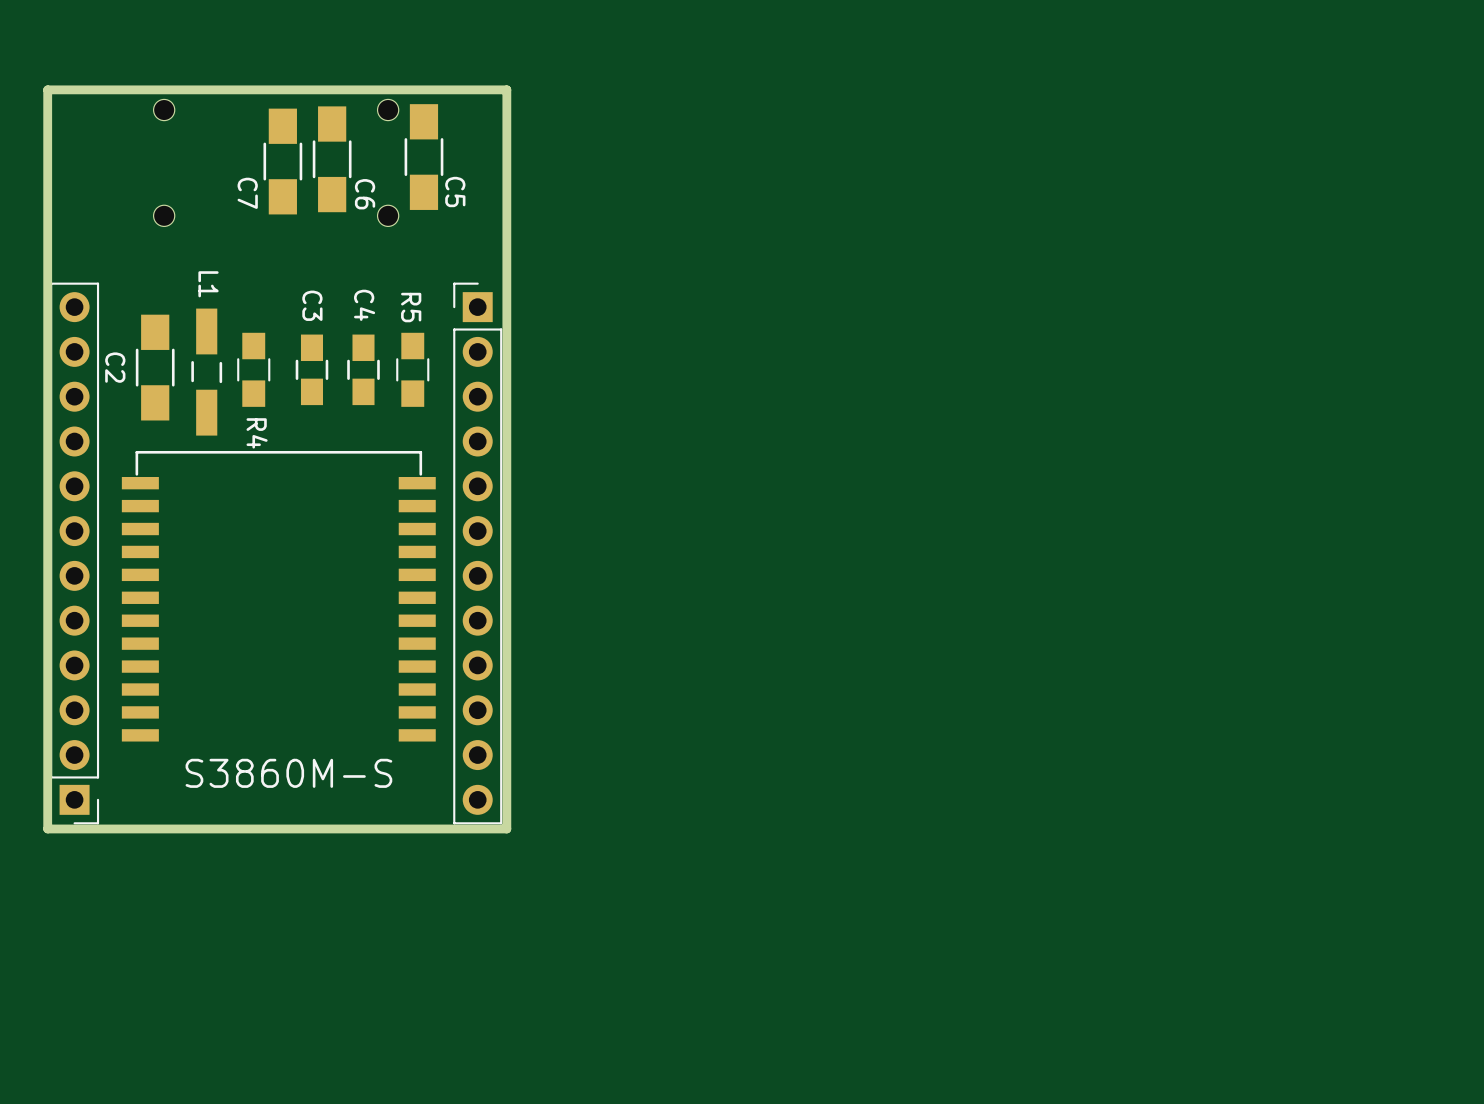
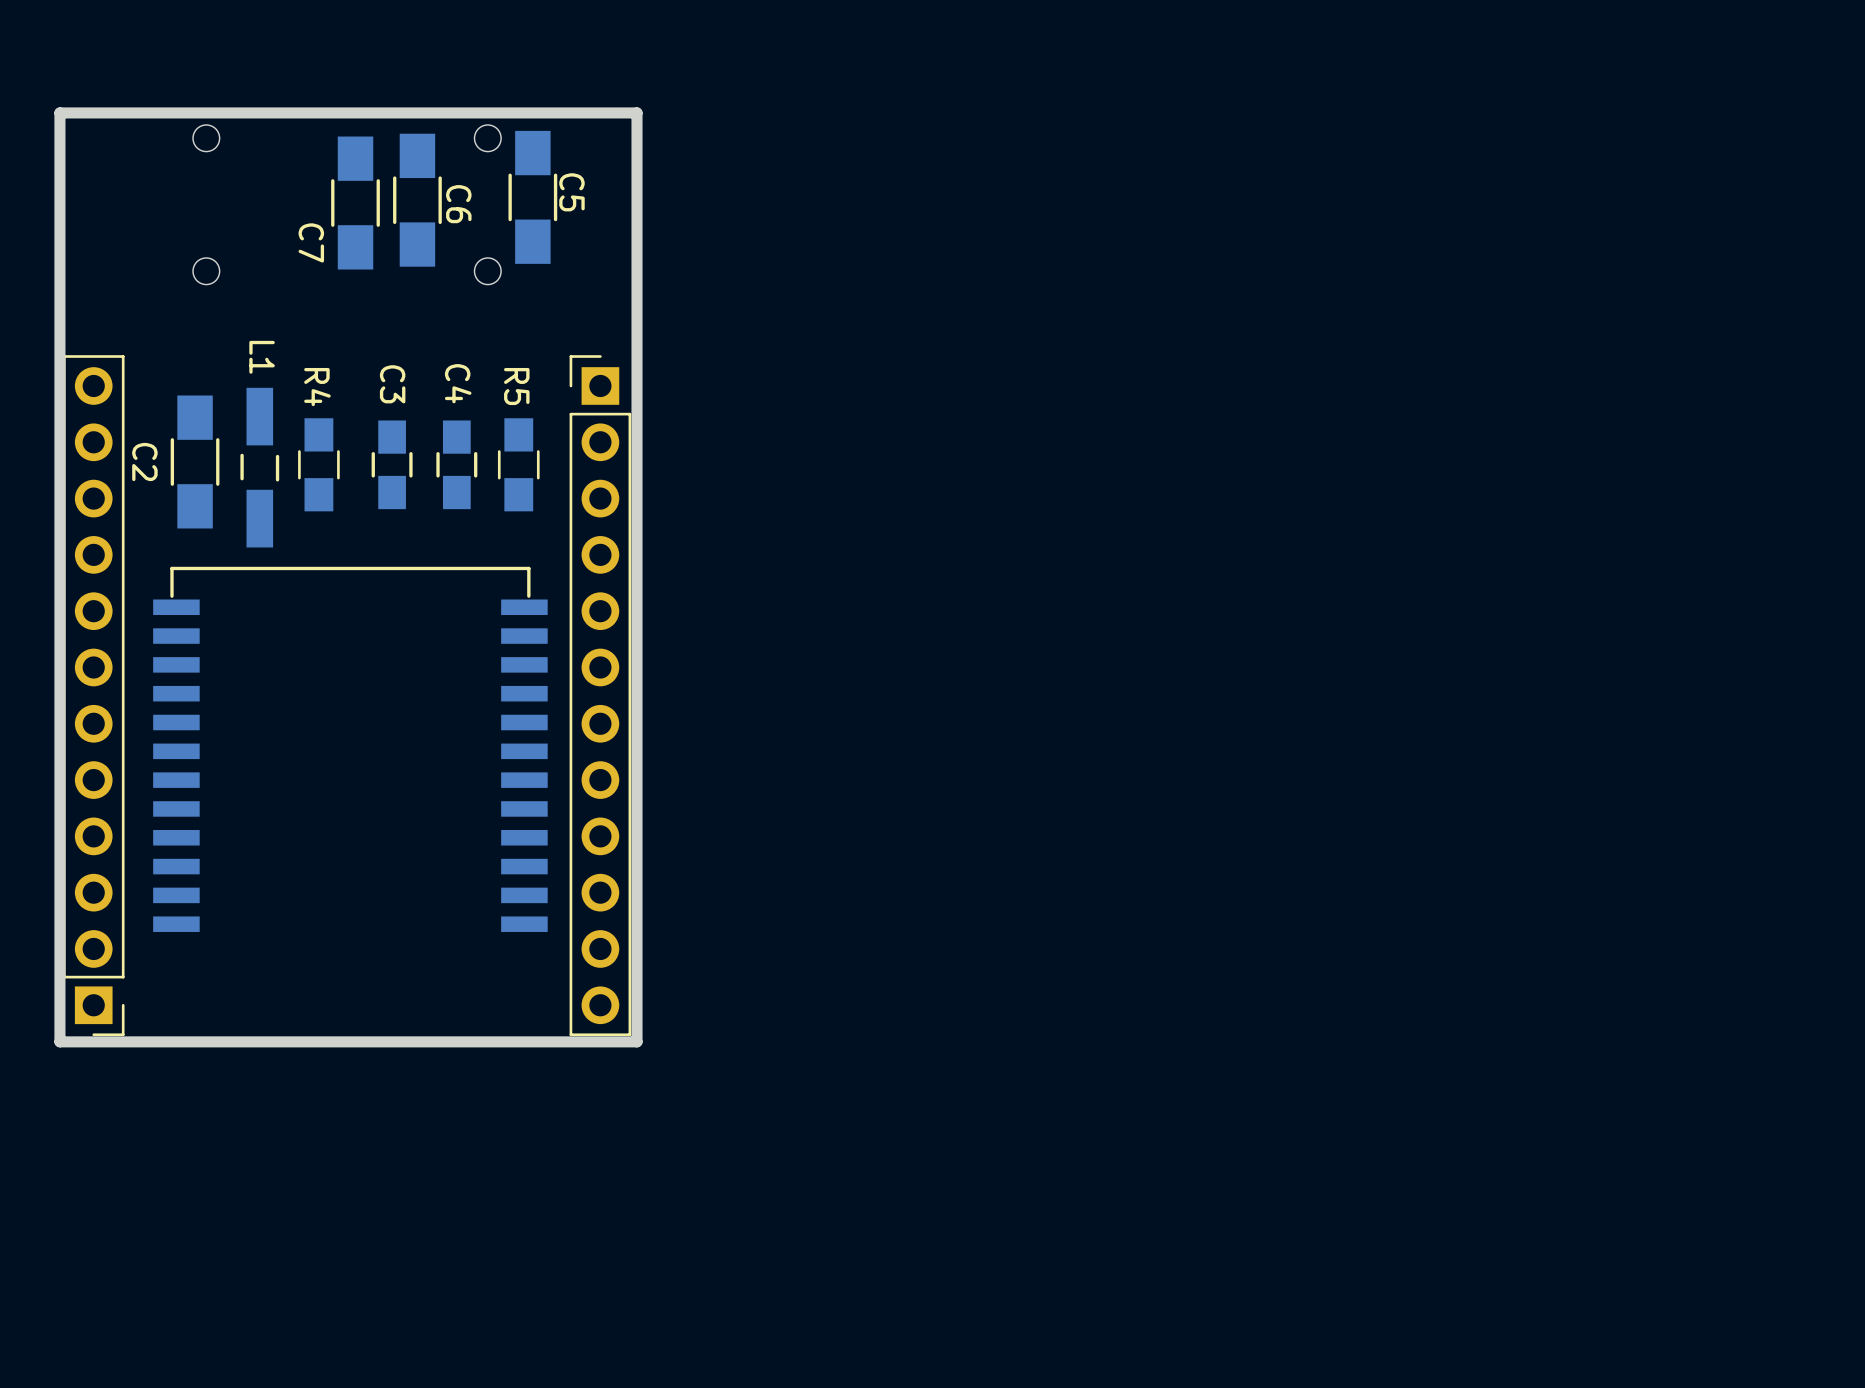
C5 name position: C5 (455, 191) -> C5 (571, 192)
C6 name position: C6 (365, 194) -> C6 (458, 204)
R4 name position: R4 (257, 433) -> R4 (317, 387)
part value: S3860M-S (288, 773) -> none

